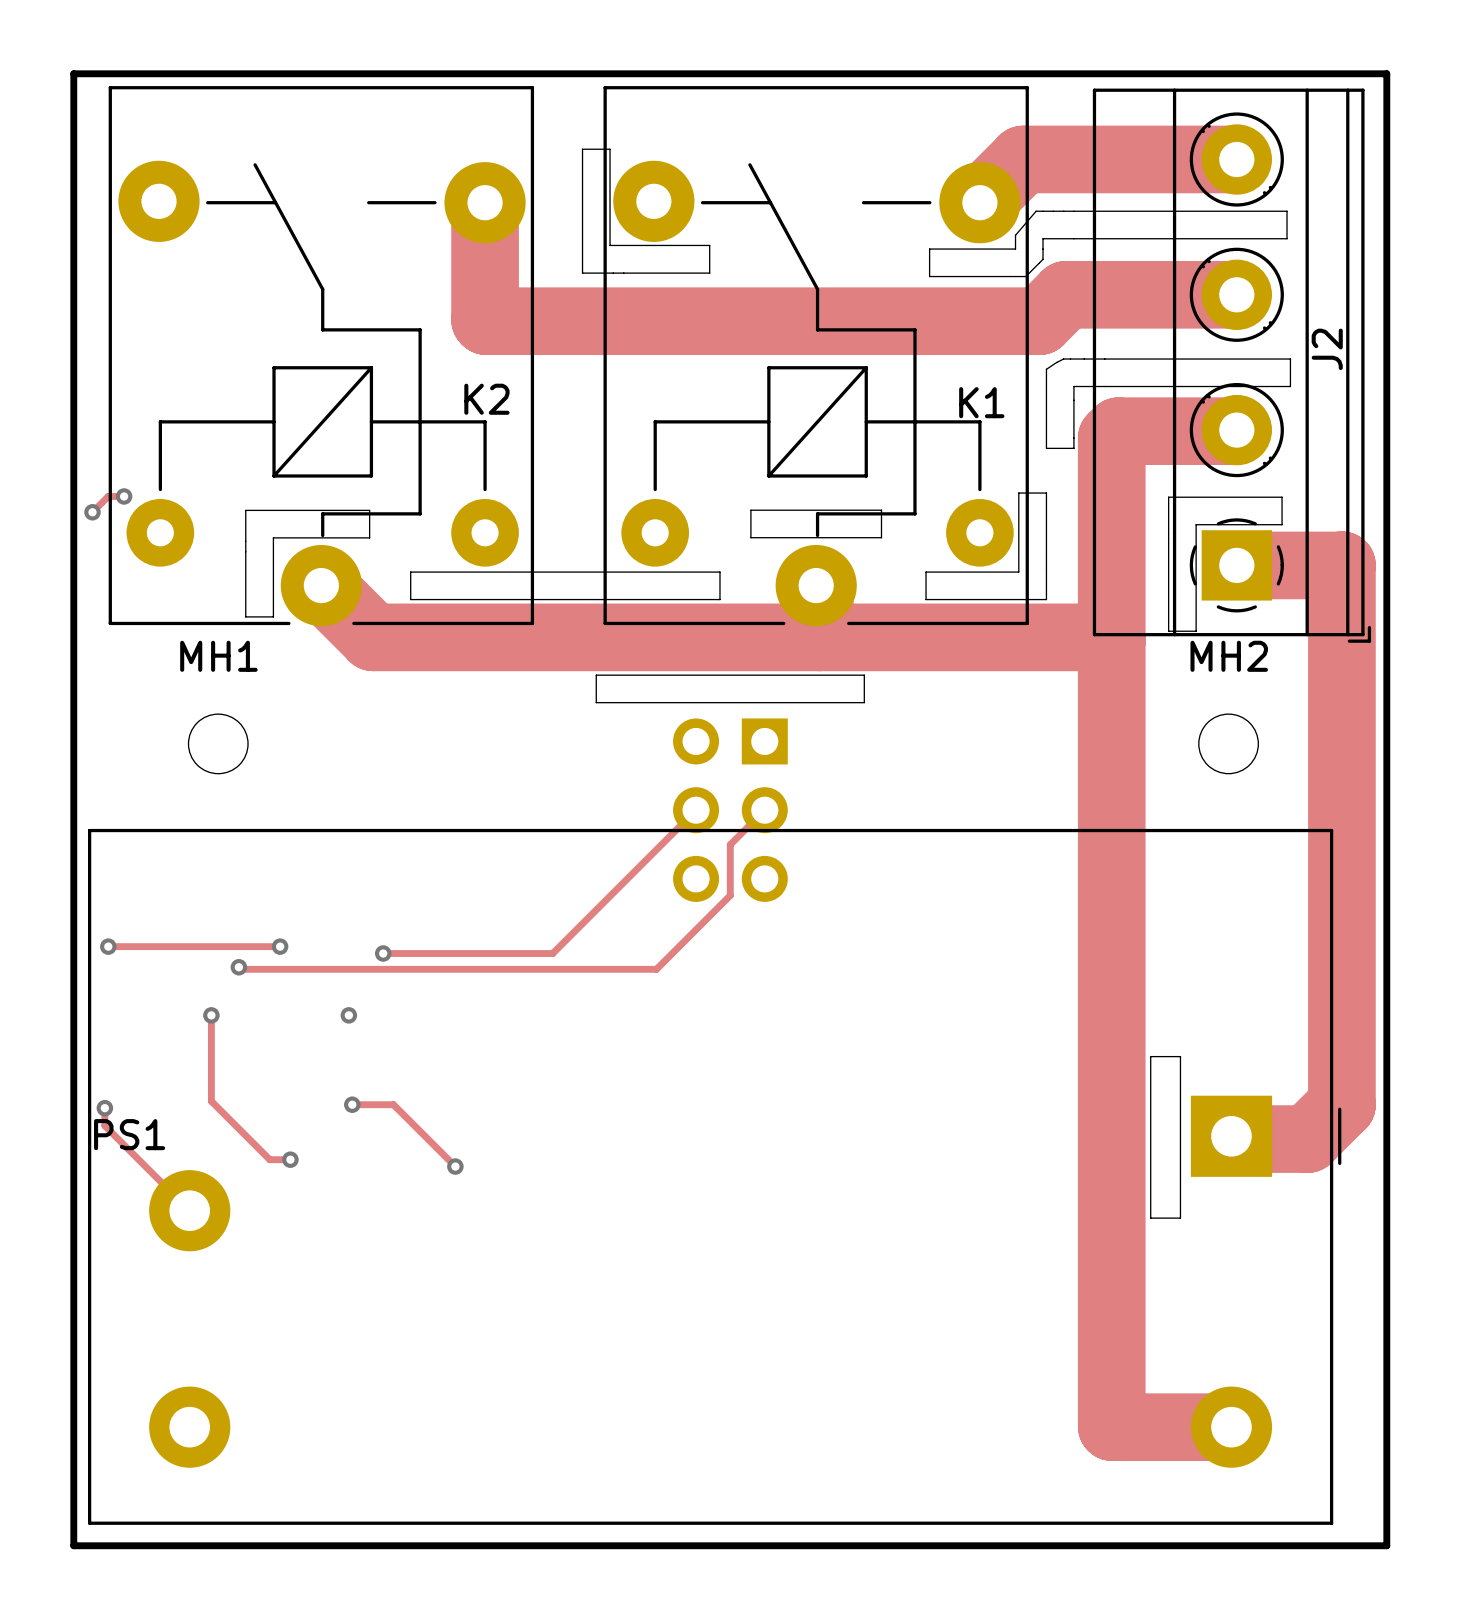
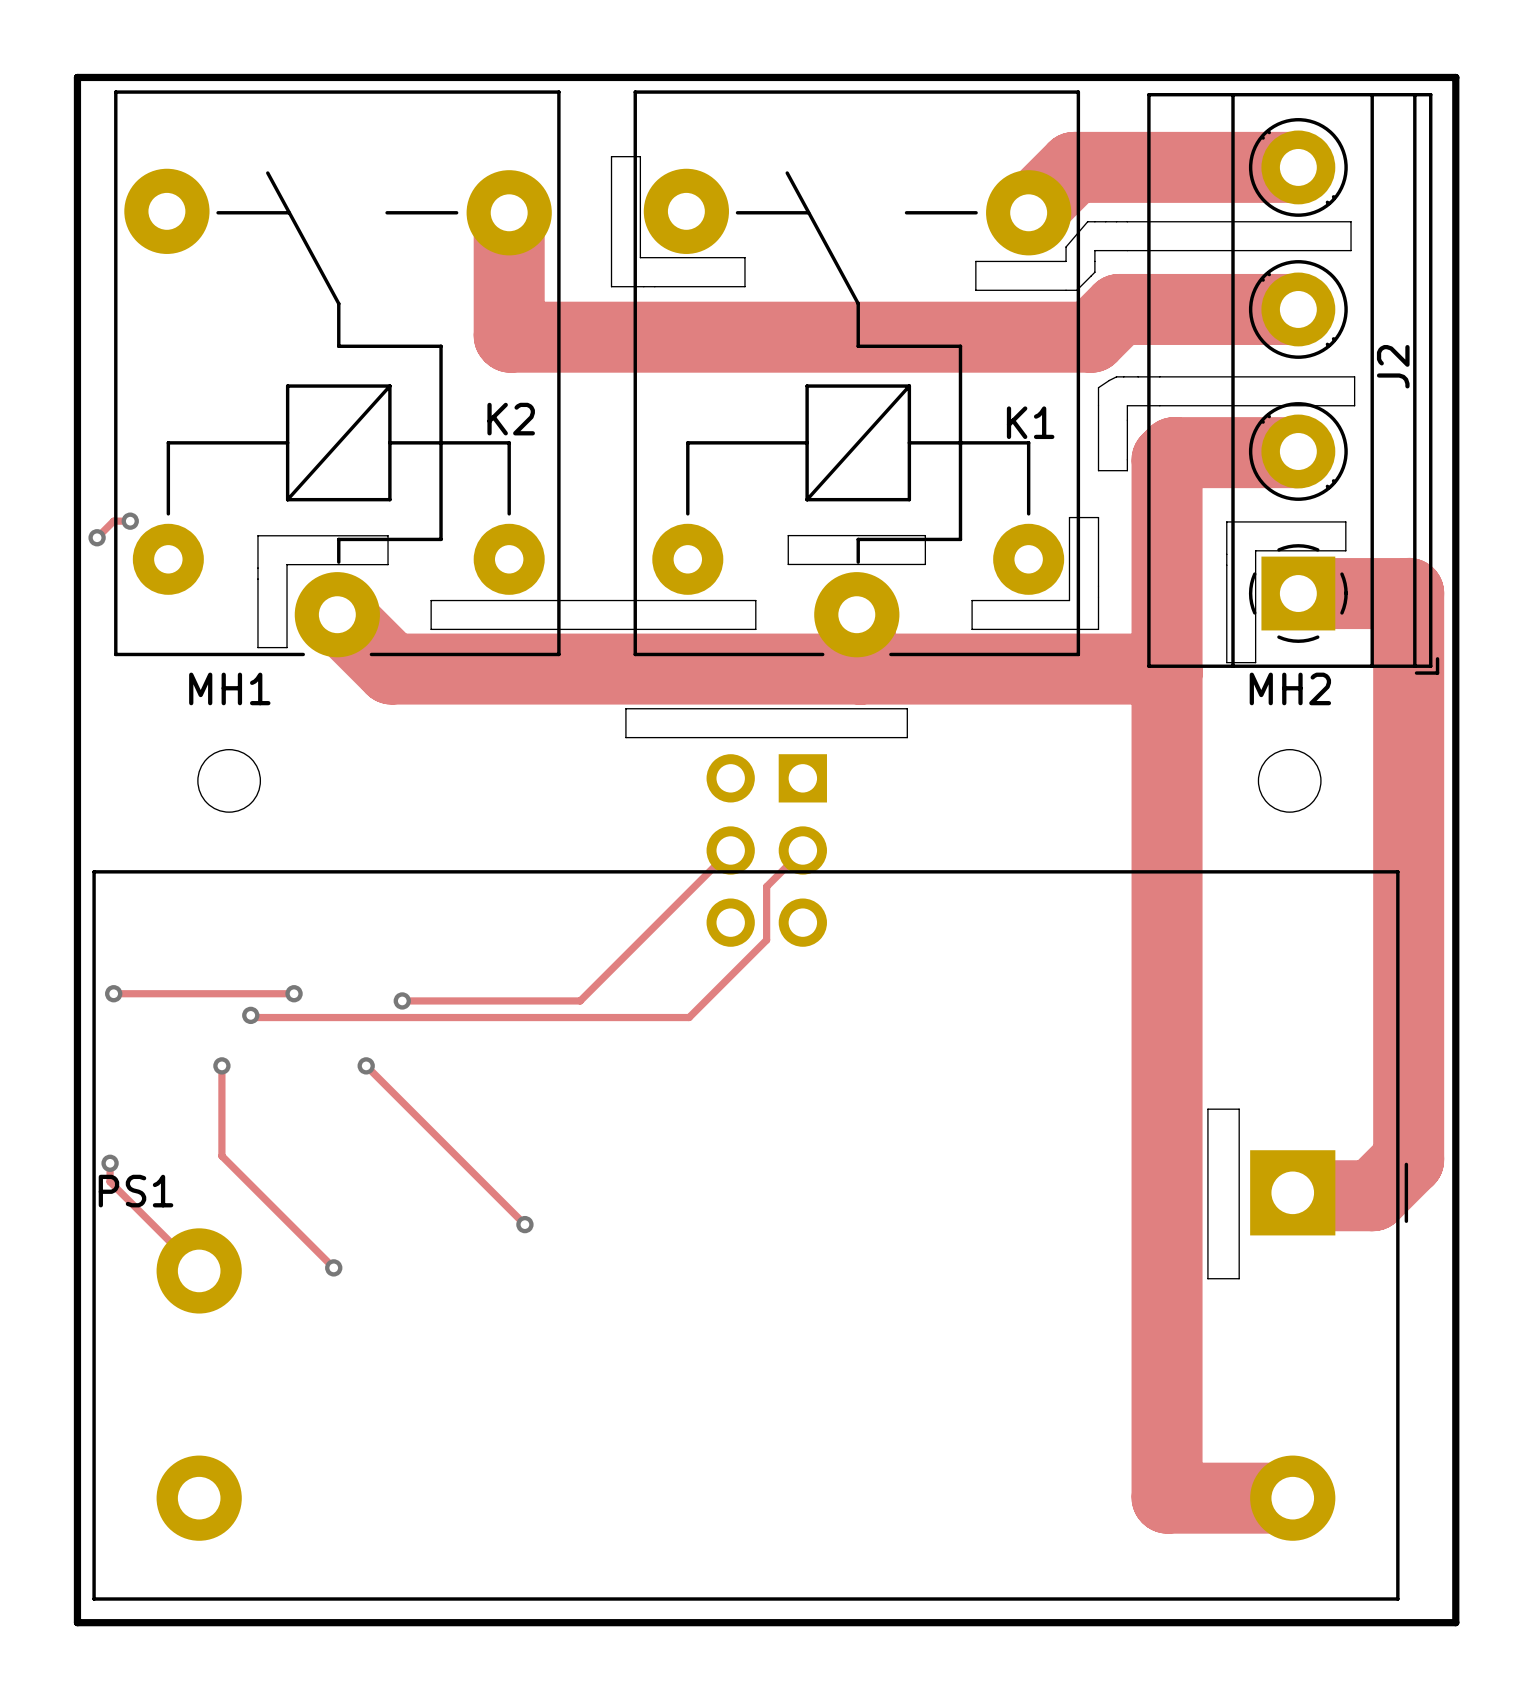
track: none -> (366, 1065) (524, 1224)
track: (352, 1104) (393, 1104) (455, 1166) -> none
via: (352, 1104) -> none
track: (269, 1159) (290, 1159) -> (283, 1217) (333, 1267)
via: (290, 1159) -> none
via position: (455, 1166) -> (524, 1224)
via: none -> (333, 1267)

